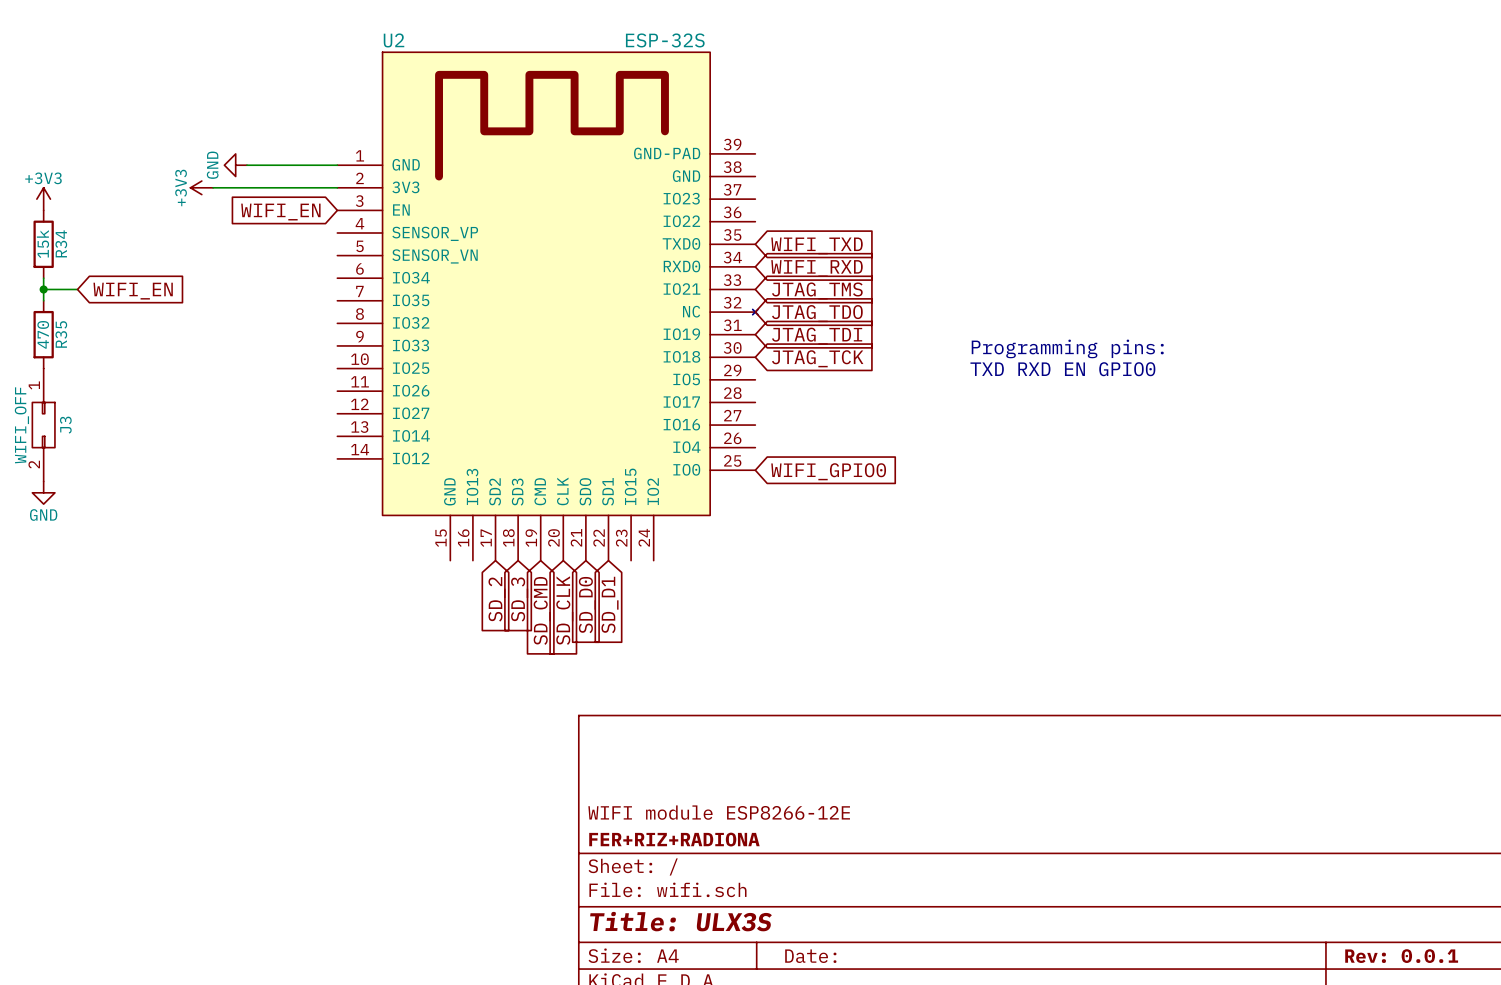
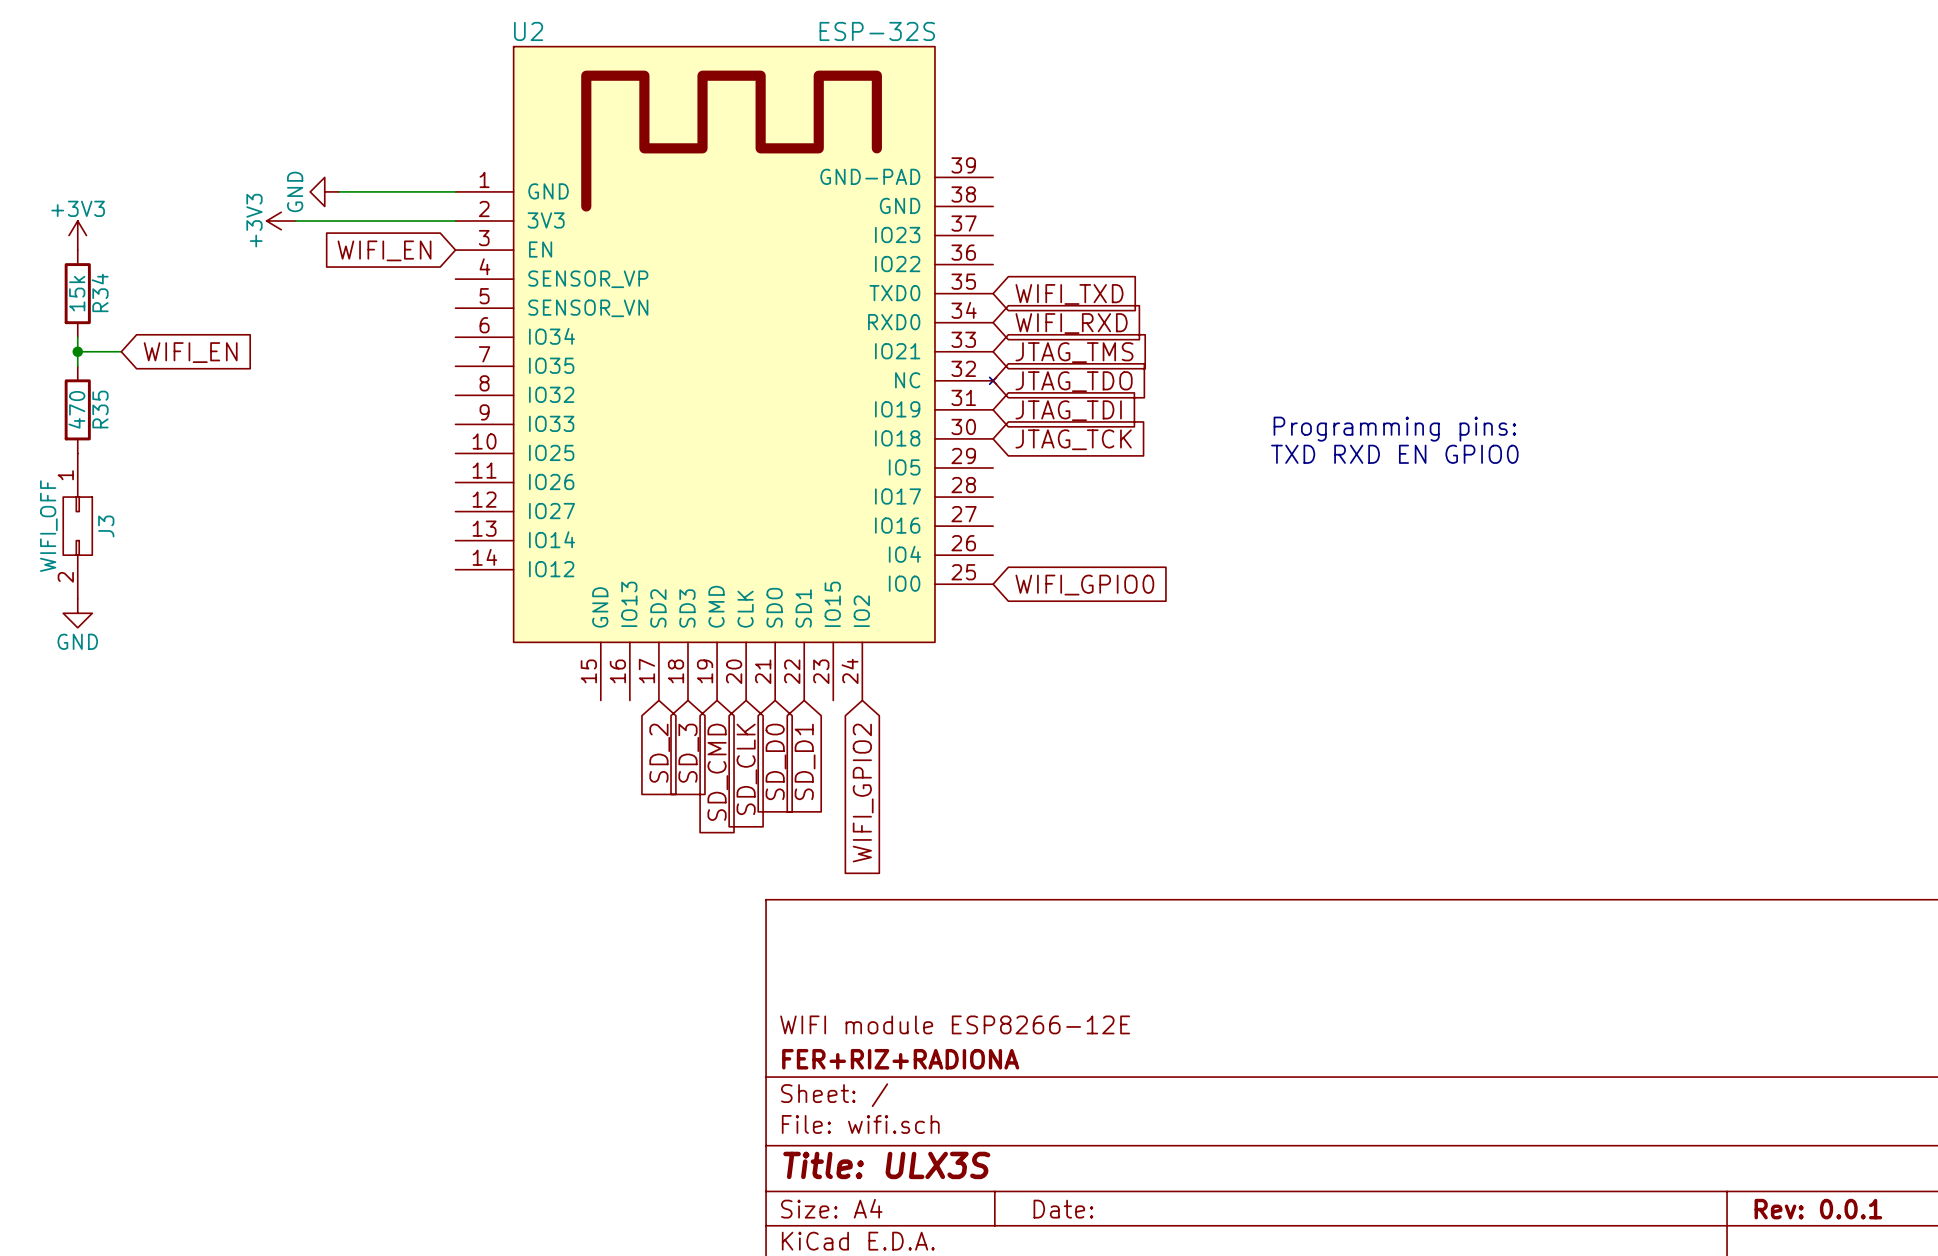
global label: none -> WIFI_GPIO2 (863, 793)

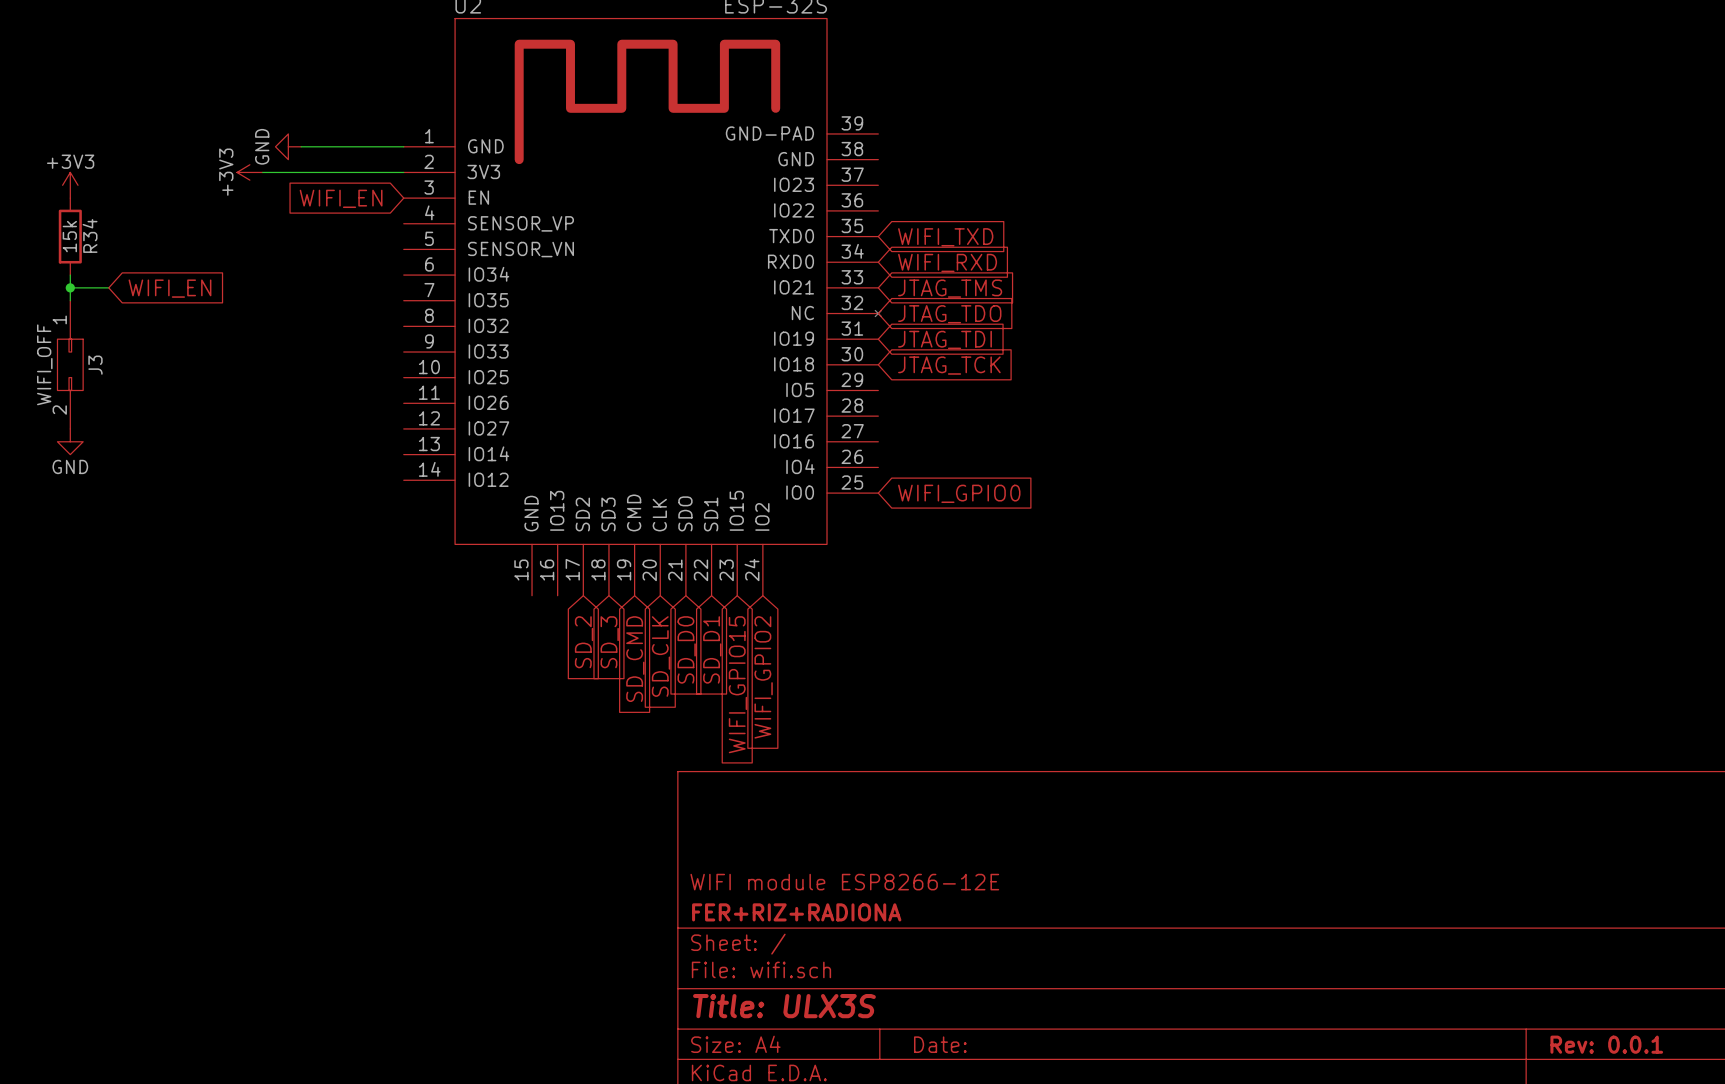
R35: 470 (77, 409) -> none
text: Programming pins: (1394, 429) -> none
text: TXD RXD EN GPIO0 (1394, 454) -> none
J3 position: (77, 526) -> (70, 364)
power symbol position: GND (77, 613) -> GND (70, 441)
global label: none -> WIFI_GPIO15 (737, 684)

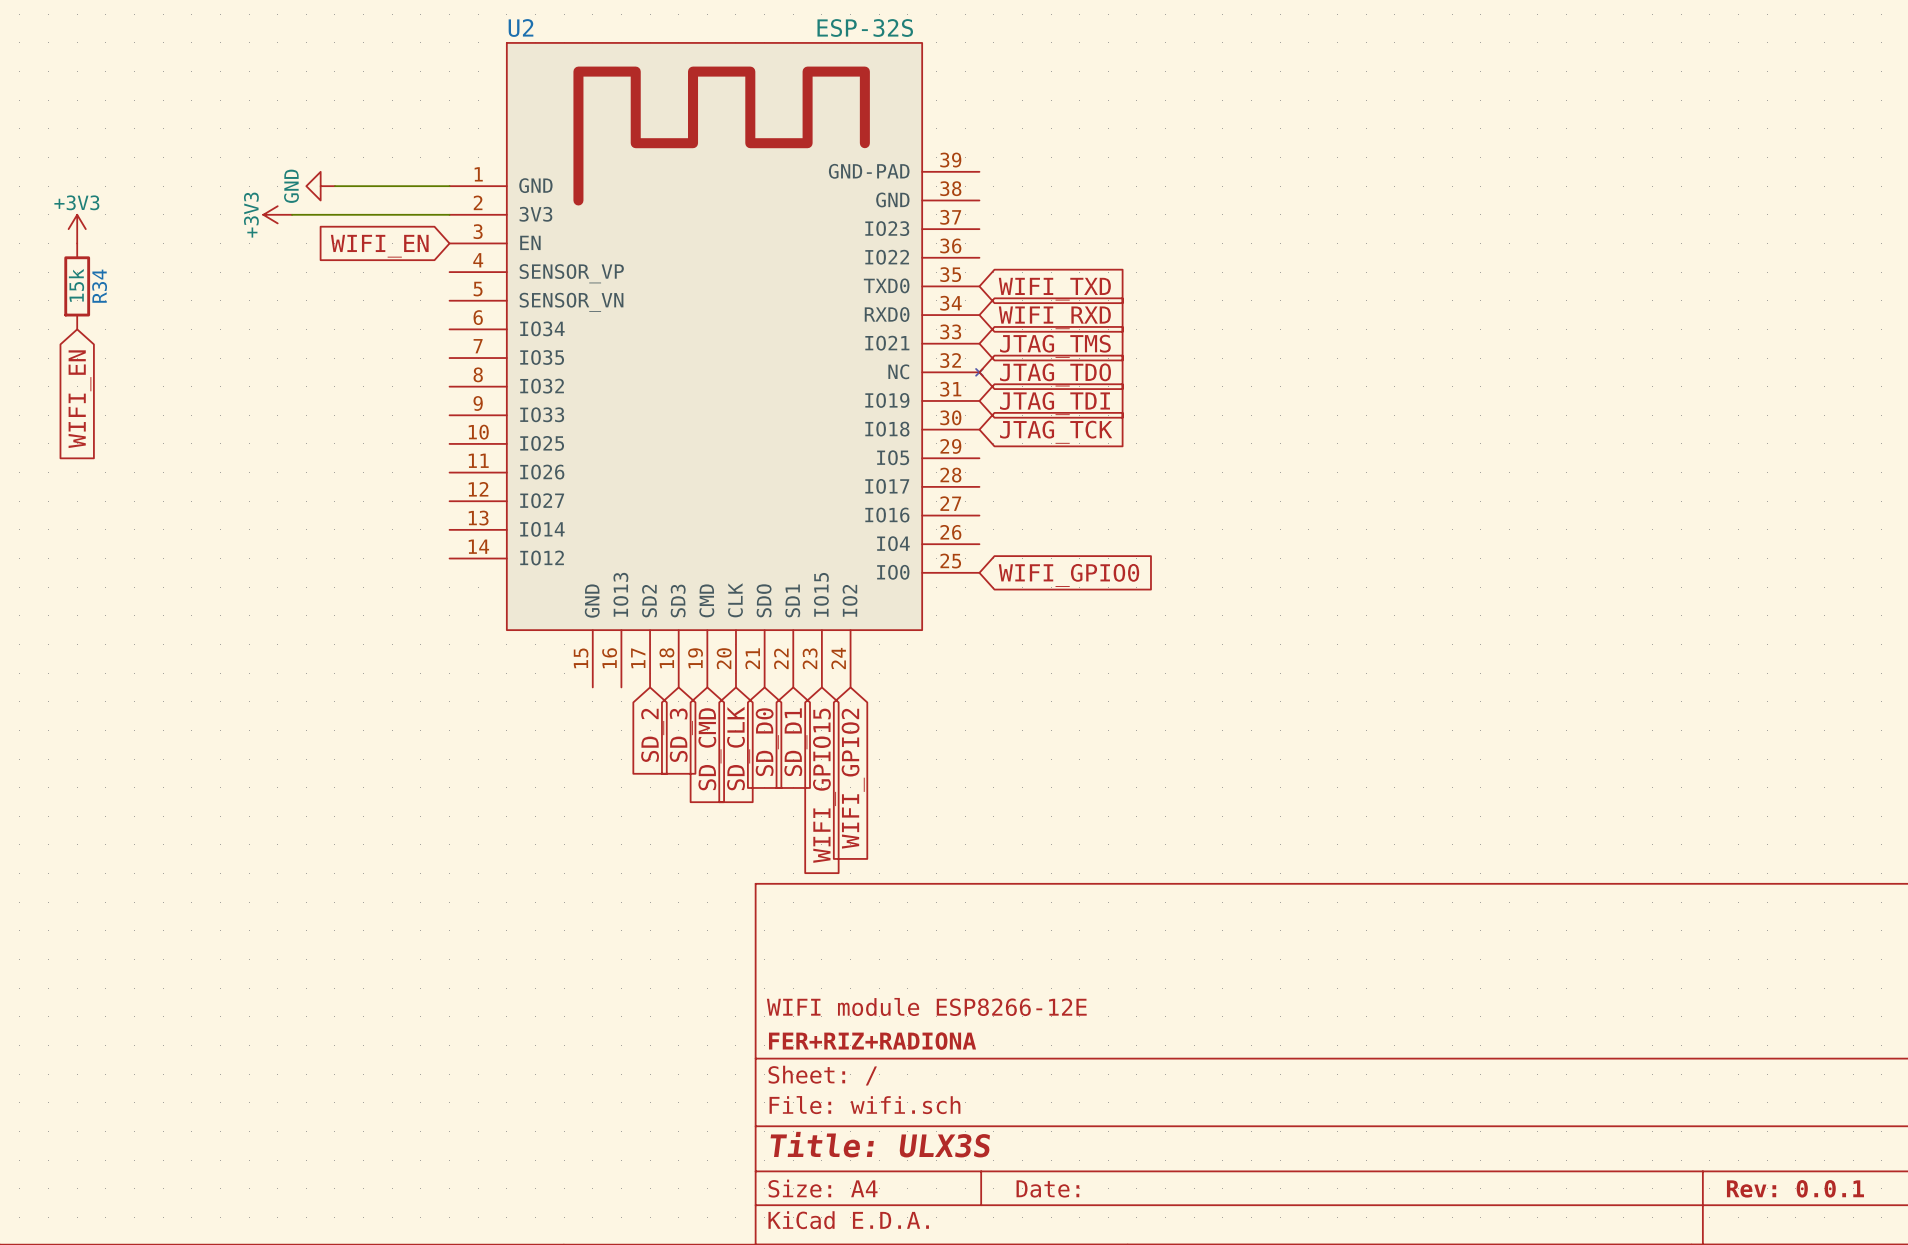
wire: (70, 275) (70, 300) -> none
wire: (70, 287) (108, 287) -> none
junction: (70, 287) -> none
global label rotation: 0° (169, 288) -> 90° clockwise (79, 399)
J3: WIFI_OFF (70, 364) -> none
power symbol: GND (70, 441) -> none

